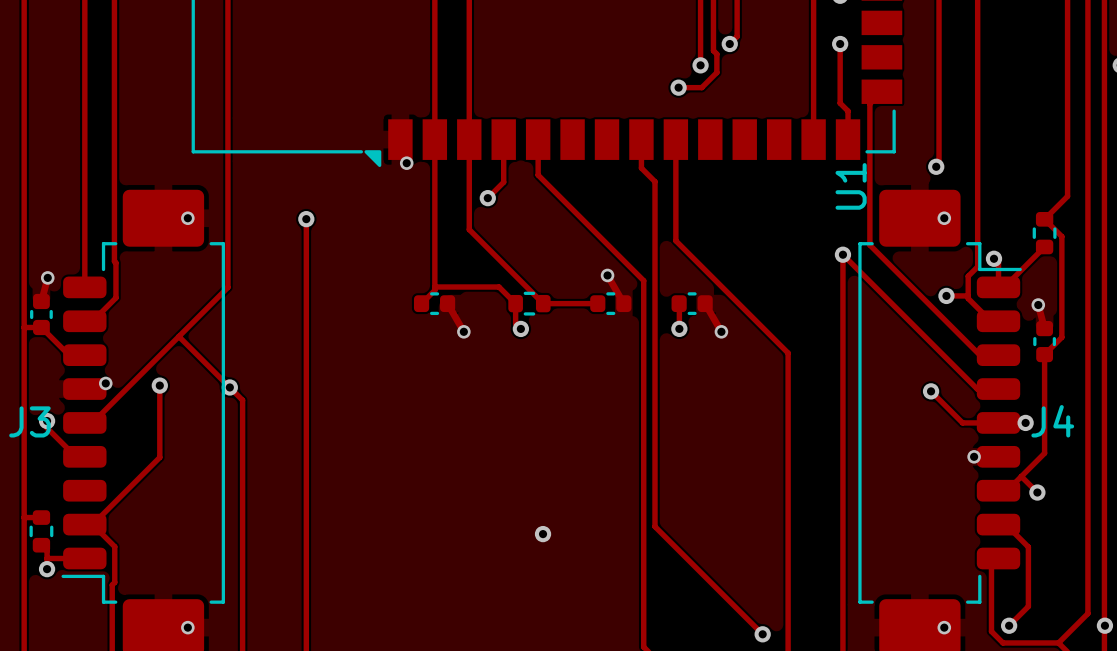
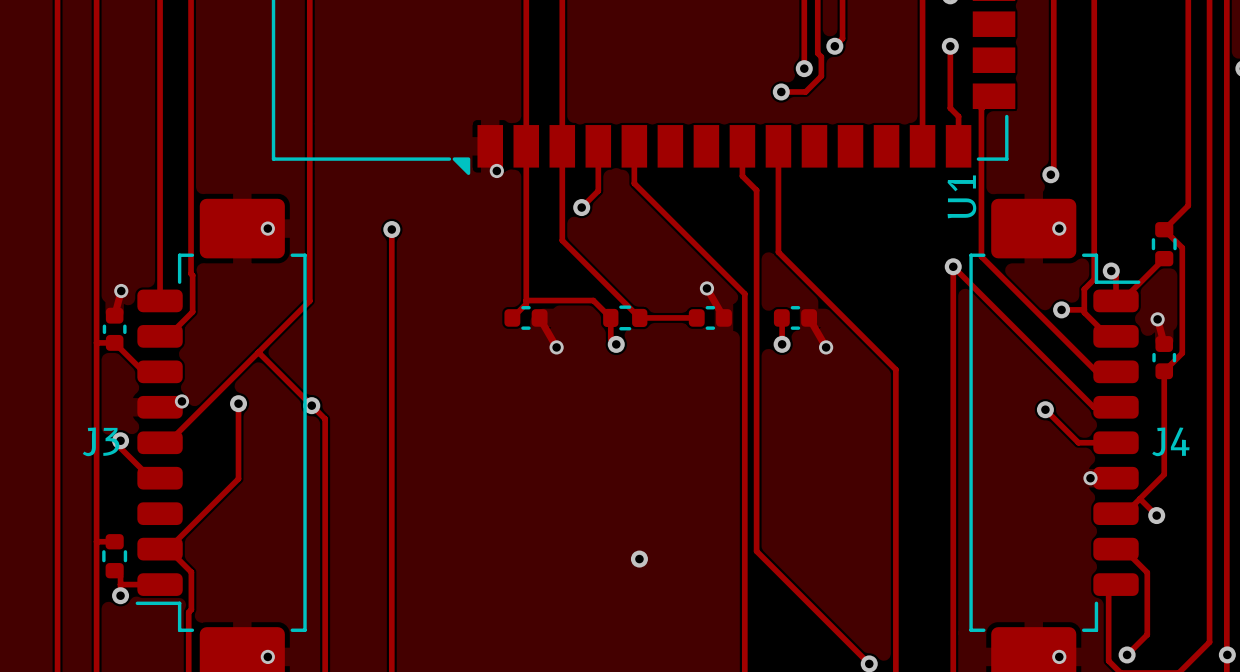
via: (1025, 422) -> none

